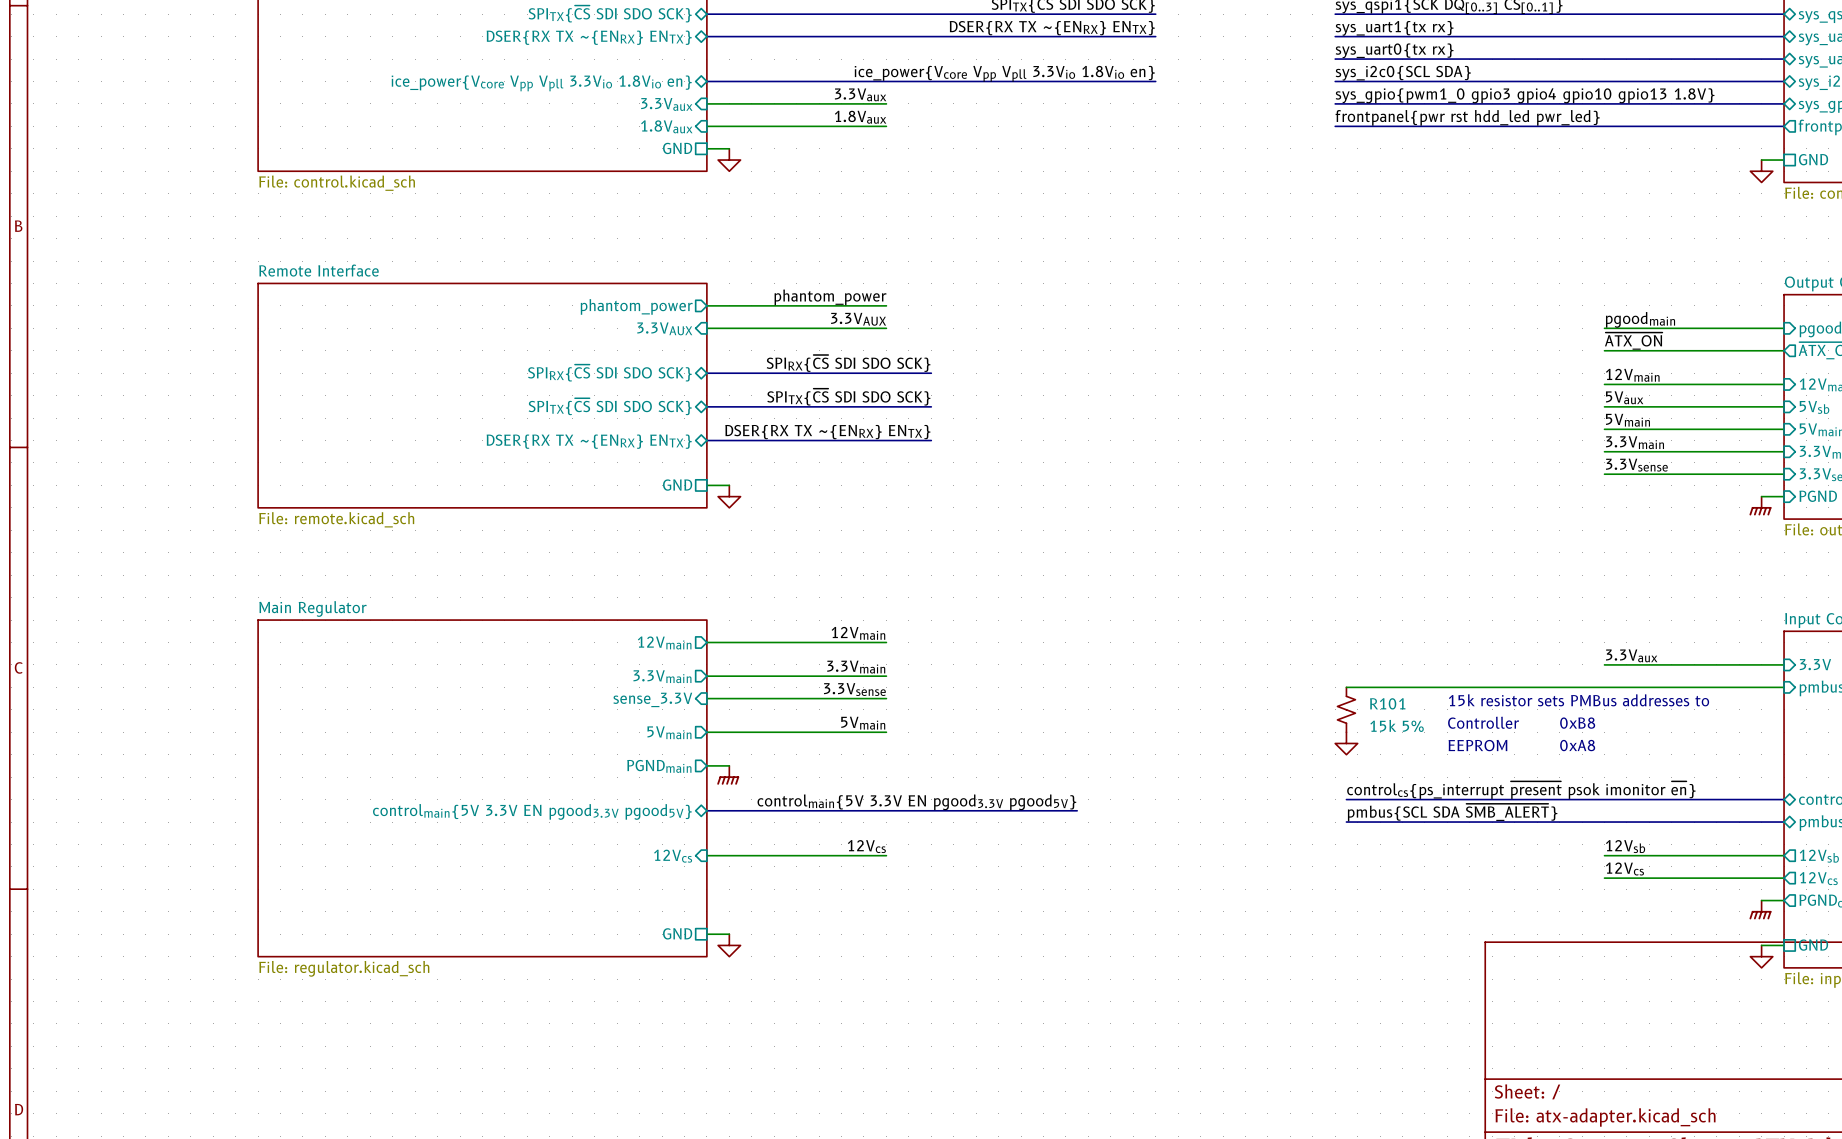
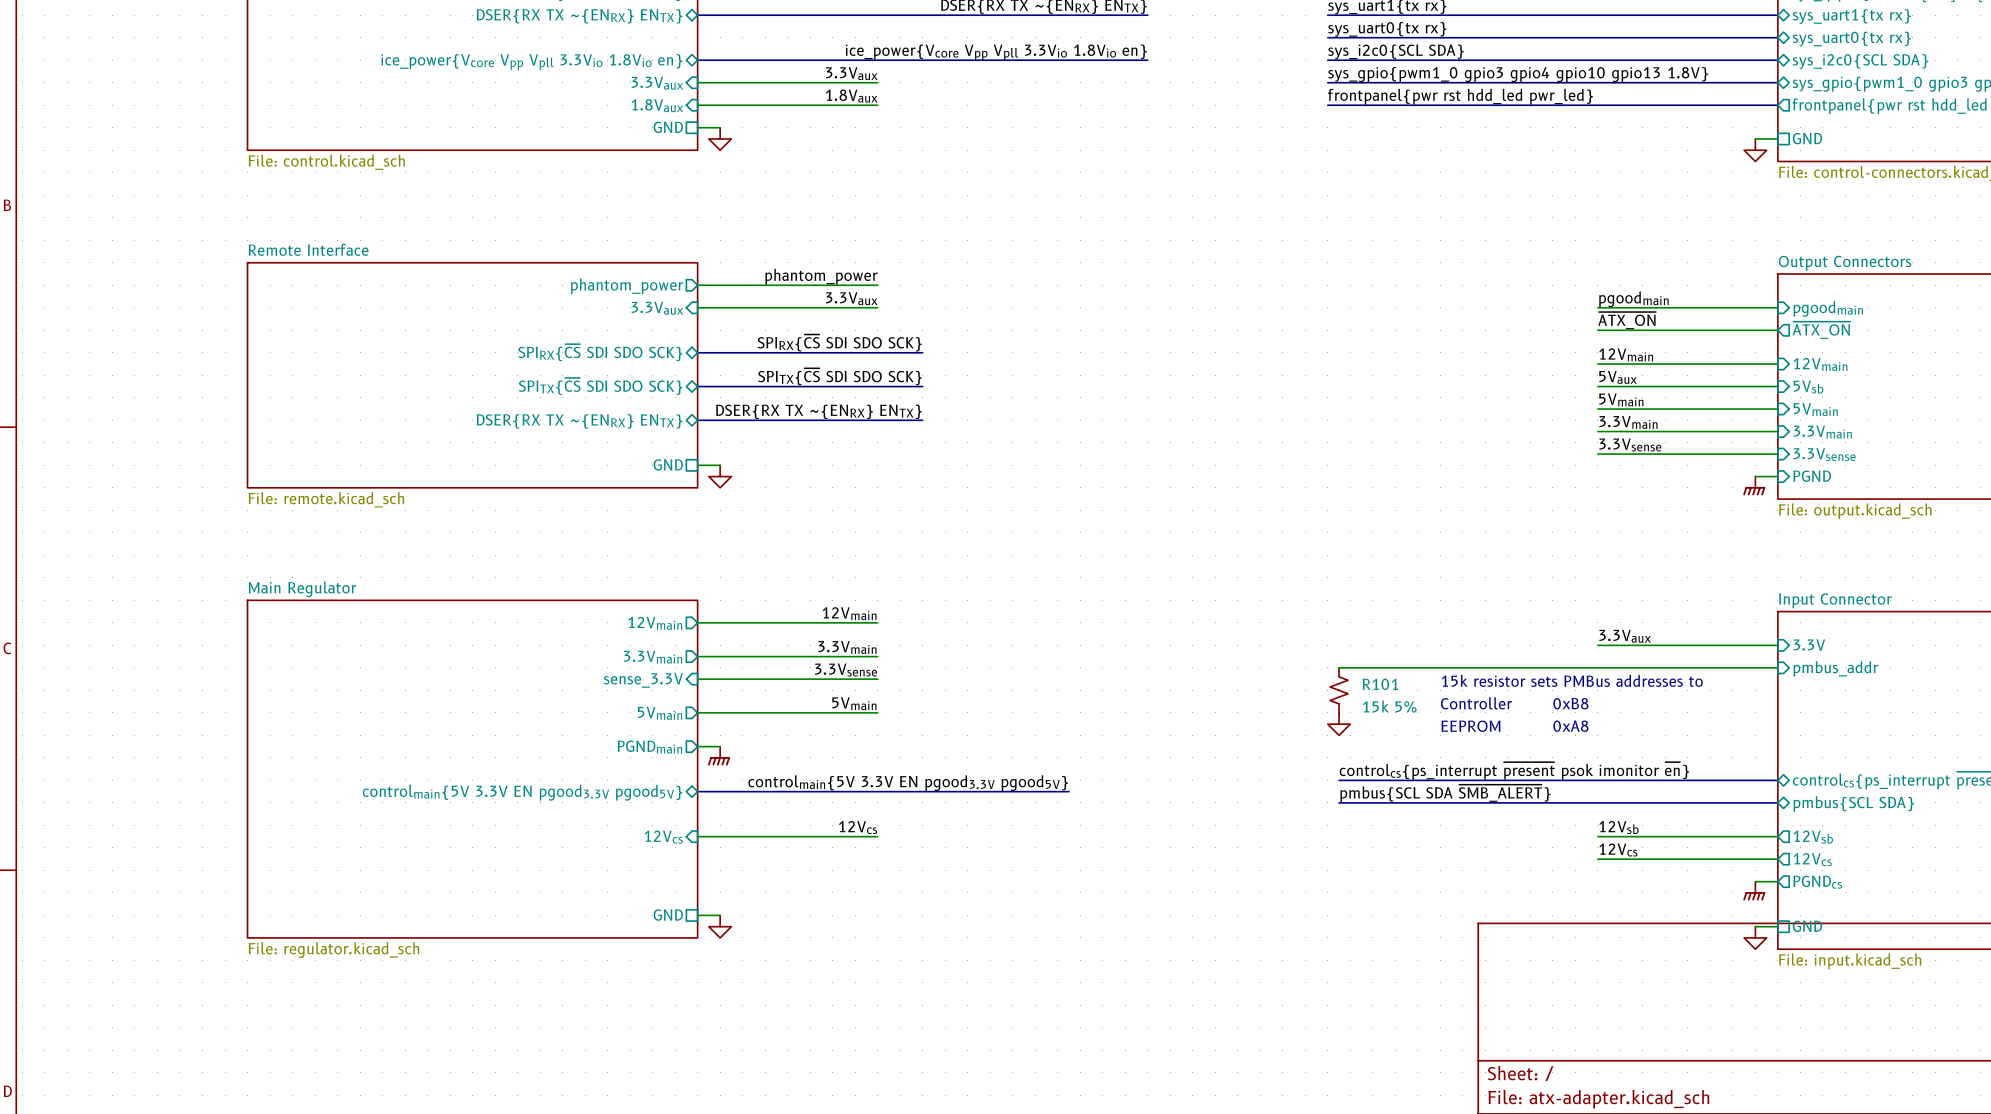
label: 3.3VAUX (858, 319) -> 3.3Vaux (851, 298)
sheet pin: 3.3VAUX (664, 328) -> 3.3Vaux (657, 308)

